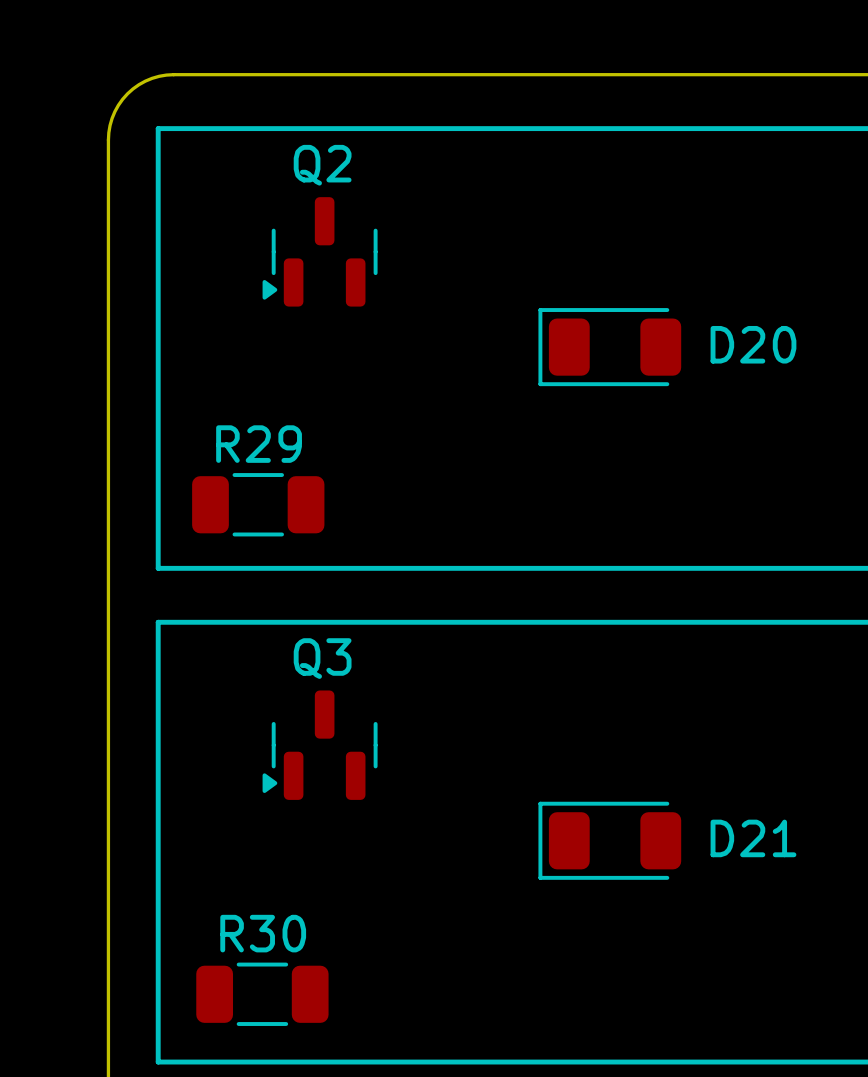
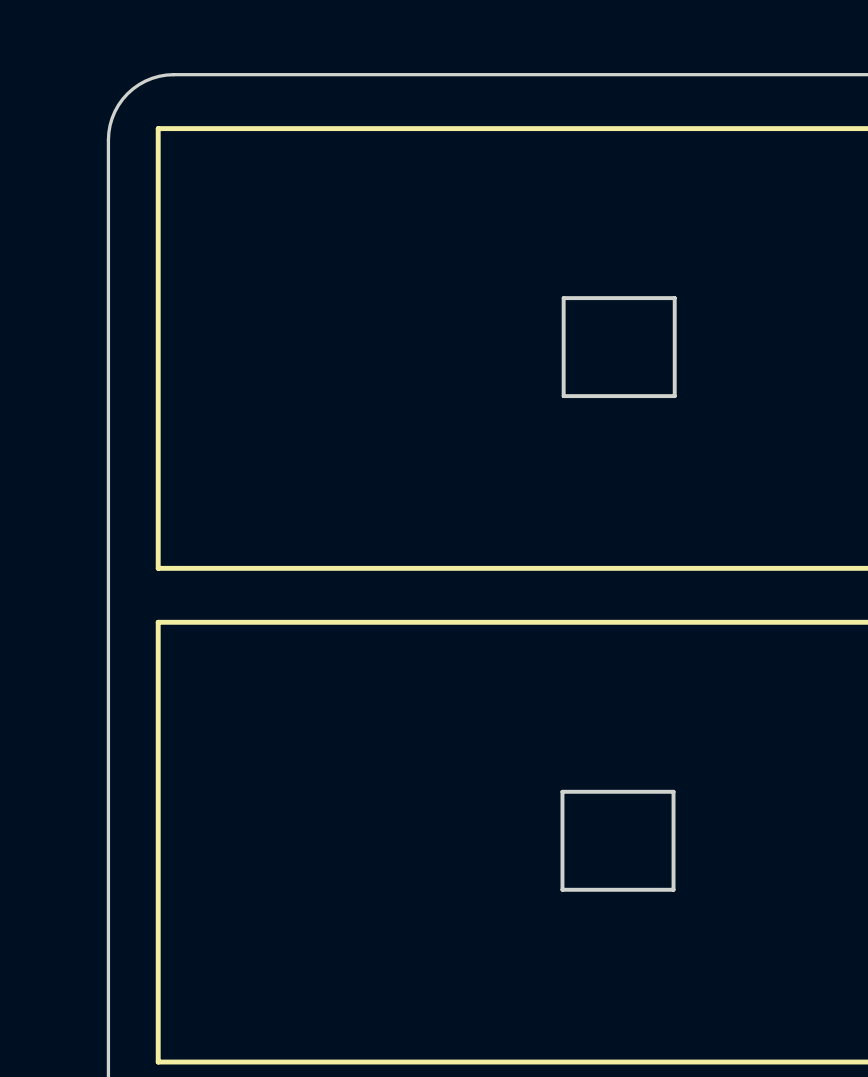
Q2: (320, 251) -> none
D20: (609, 347) -> none
part: none -> (619, 347)
R29: (258, 504) -> none
Q3: (320, 745) -> none
D21: (609, 840) -> none
part: none -> (618, 840)
R30: (262, 994) -> none

